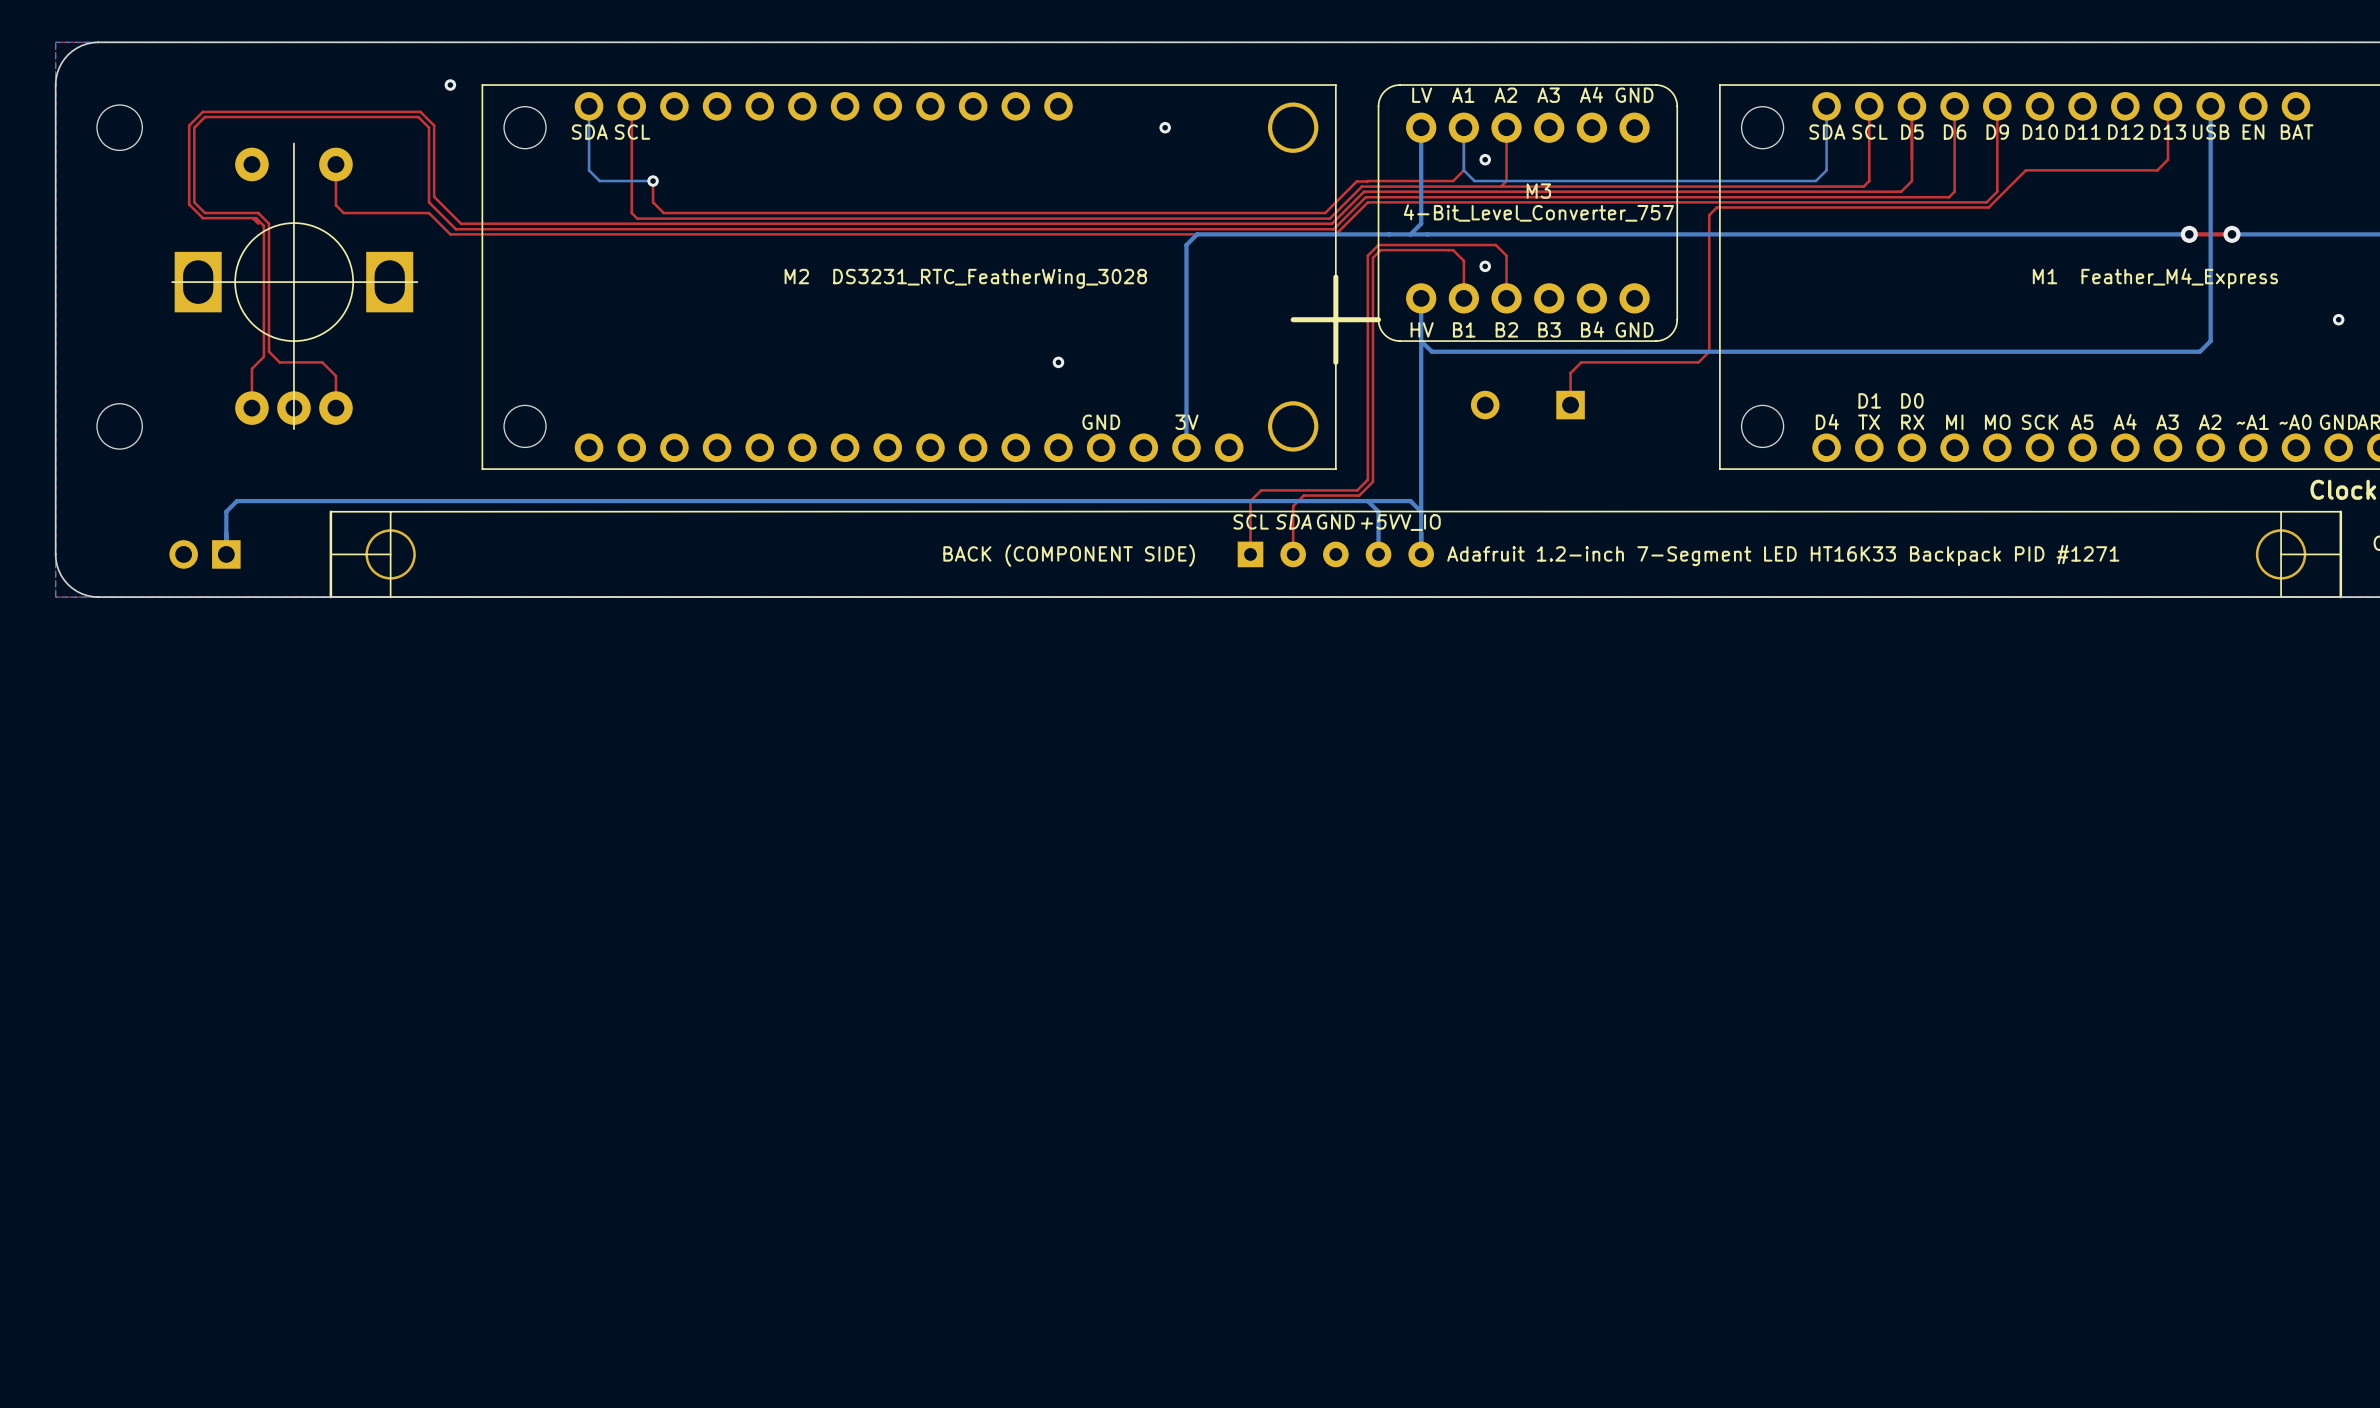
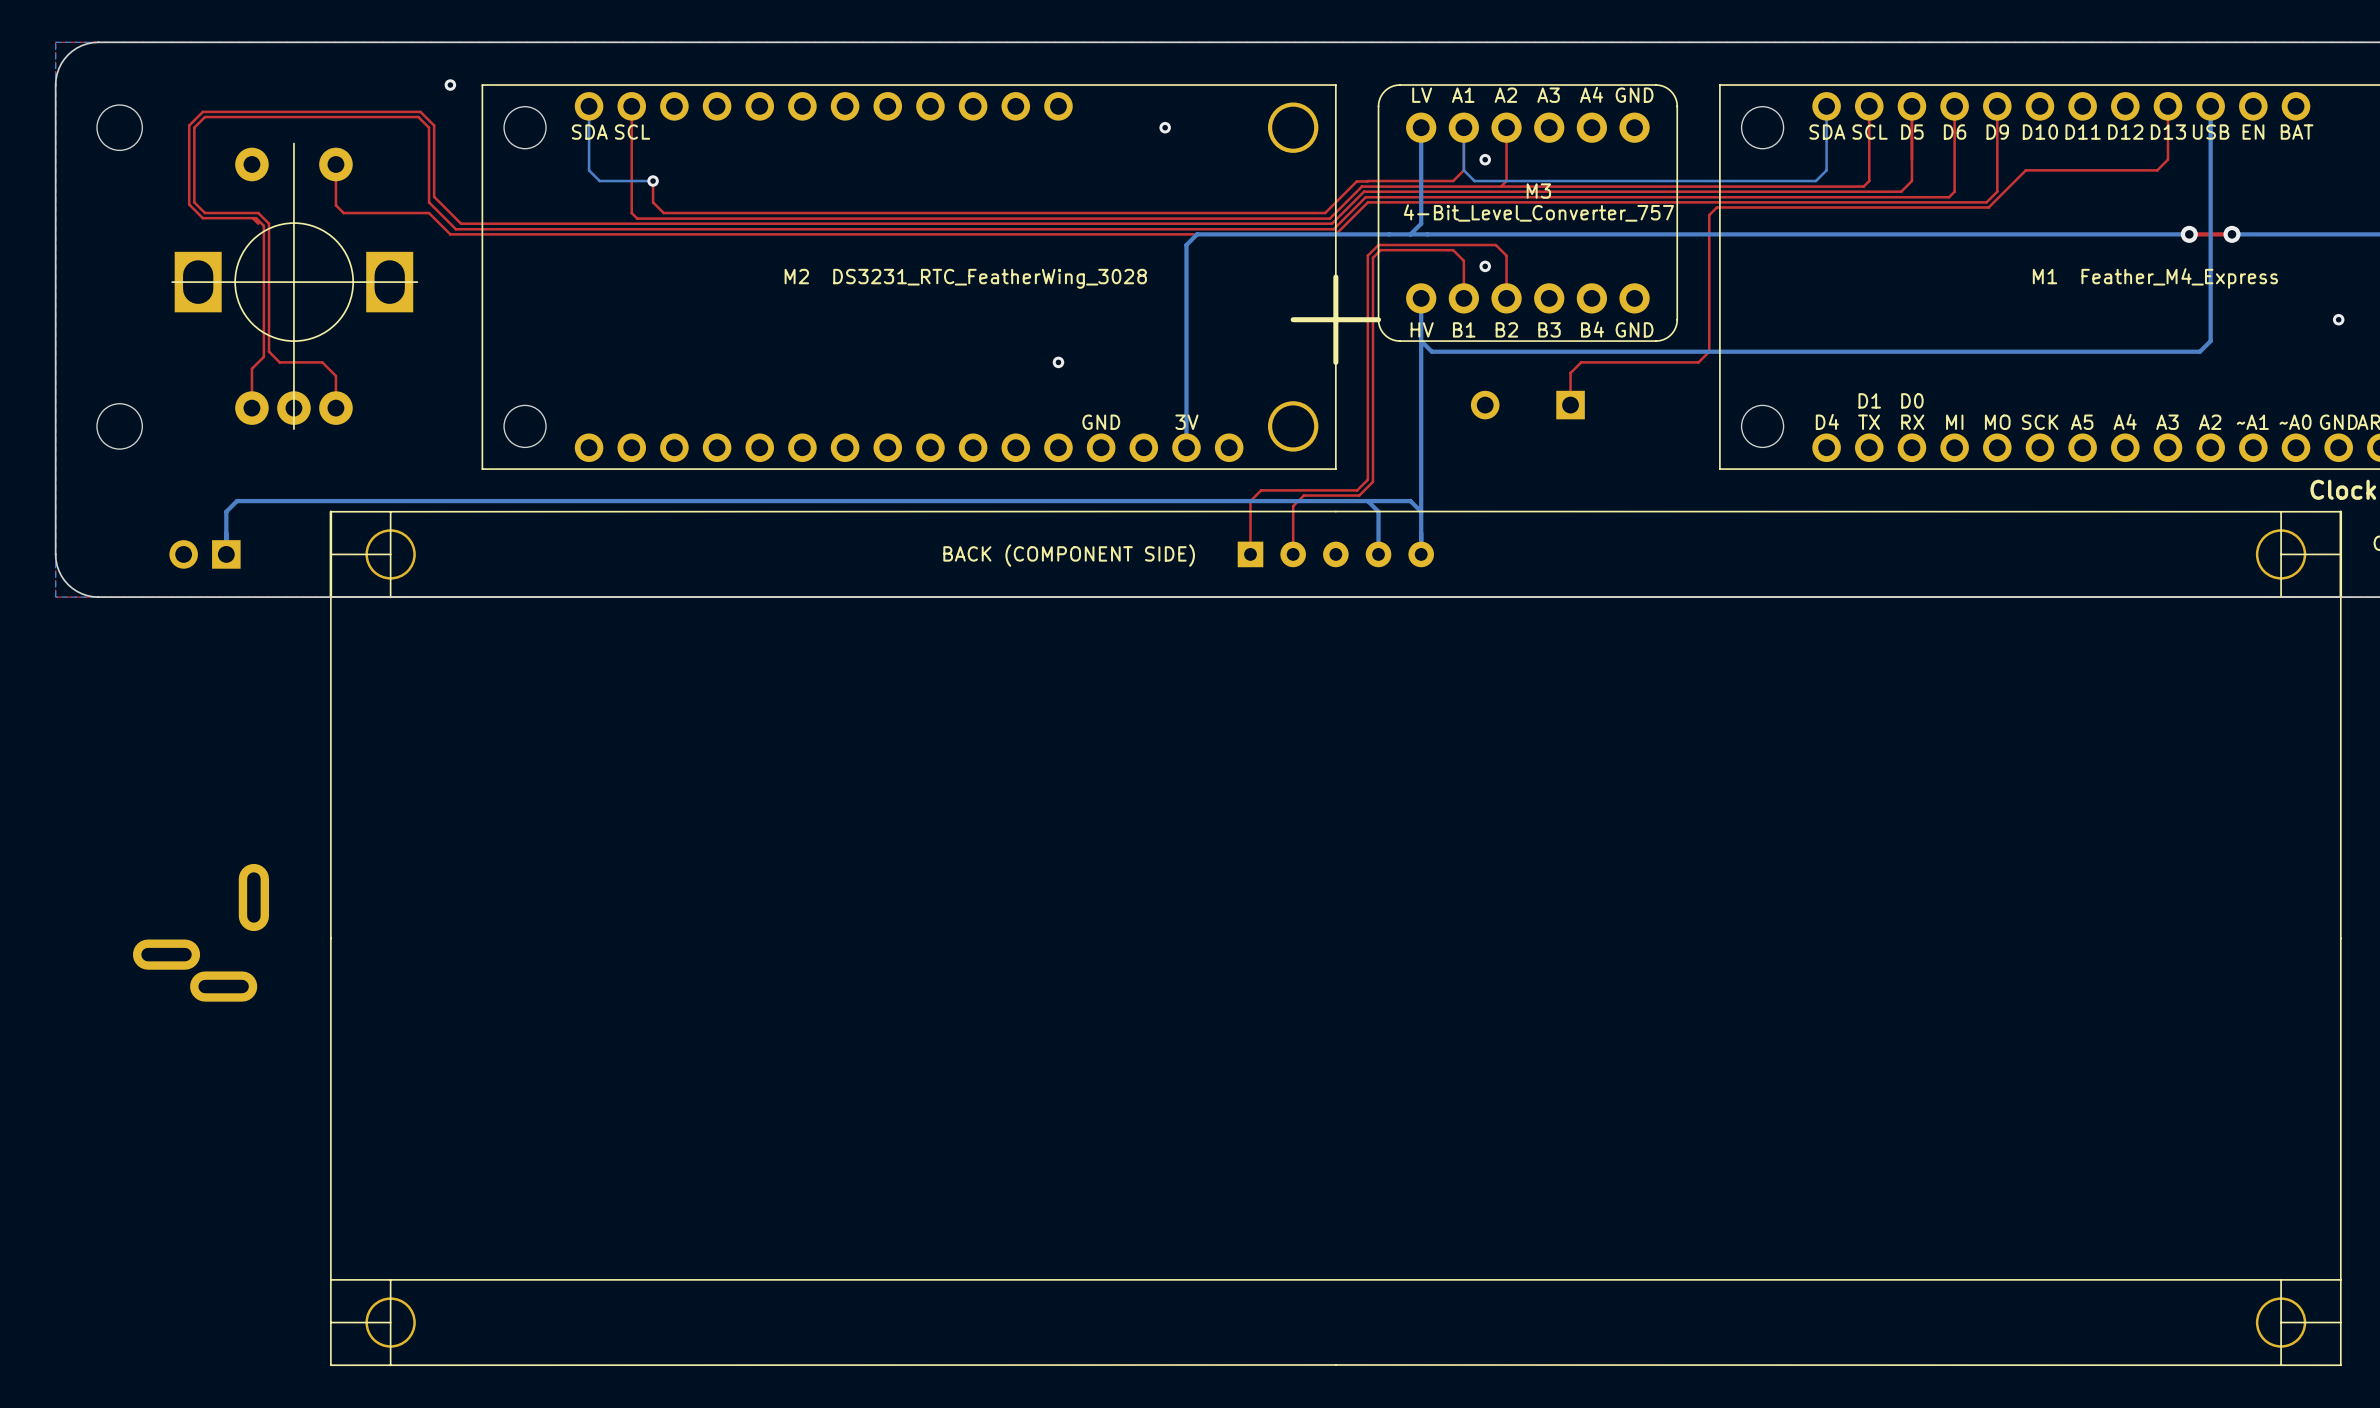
part: (1335, 554) -> none
part: none -> (200, 932)
part: none -> (1335, 938)

